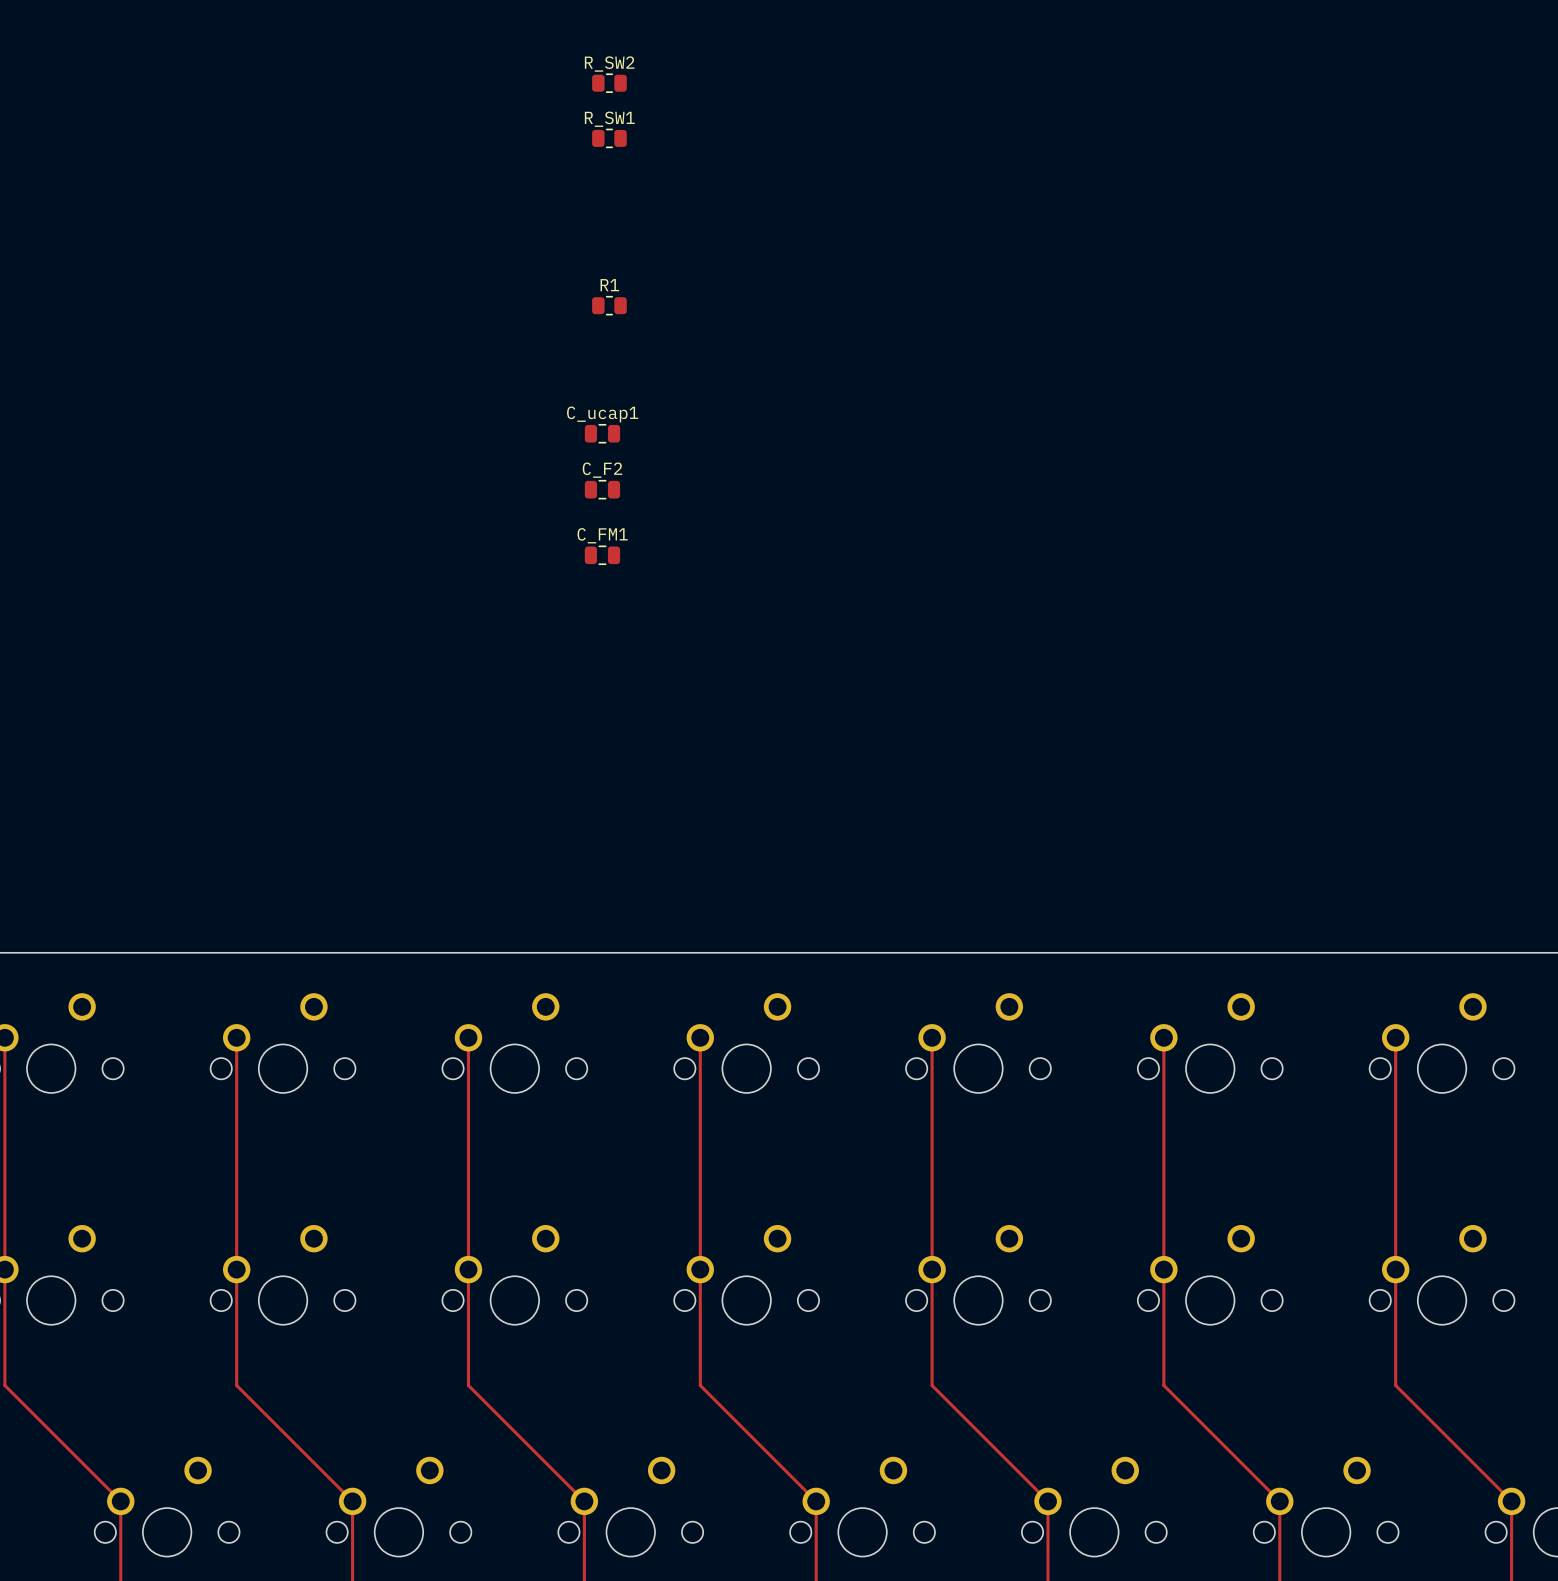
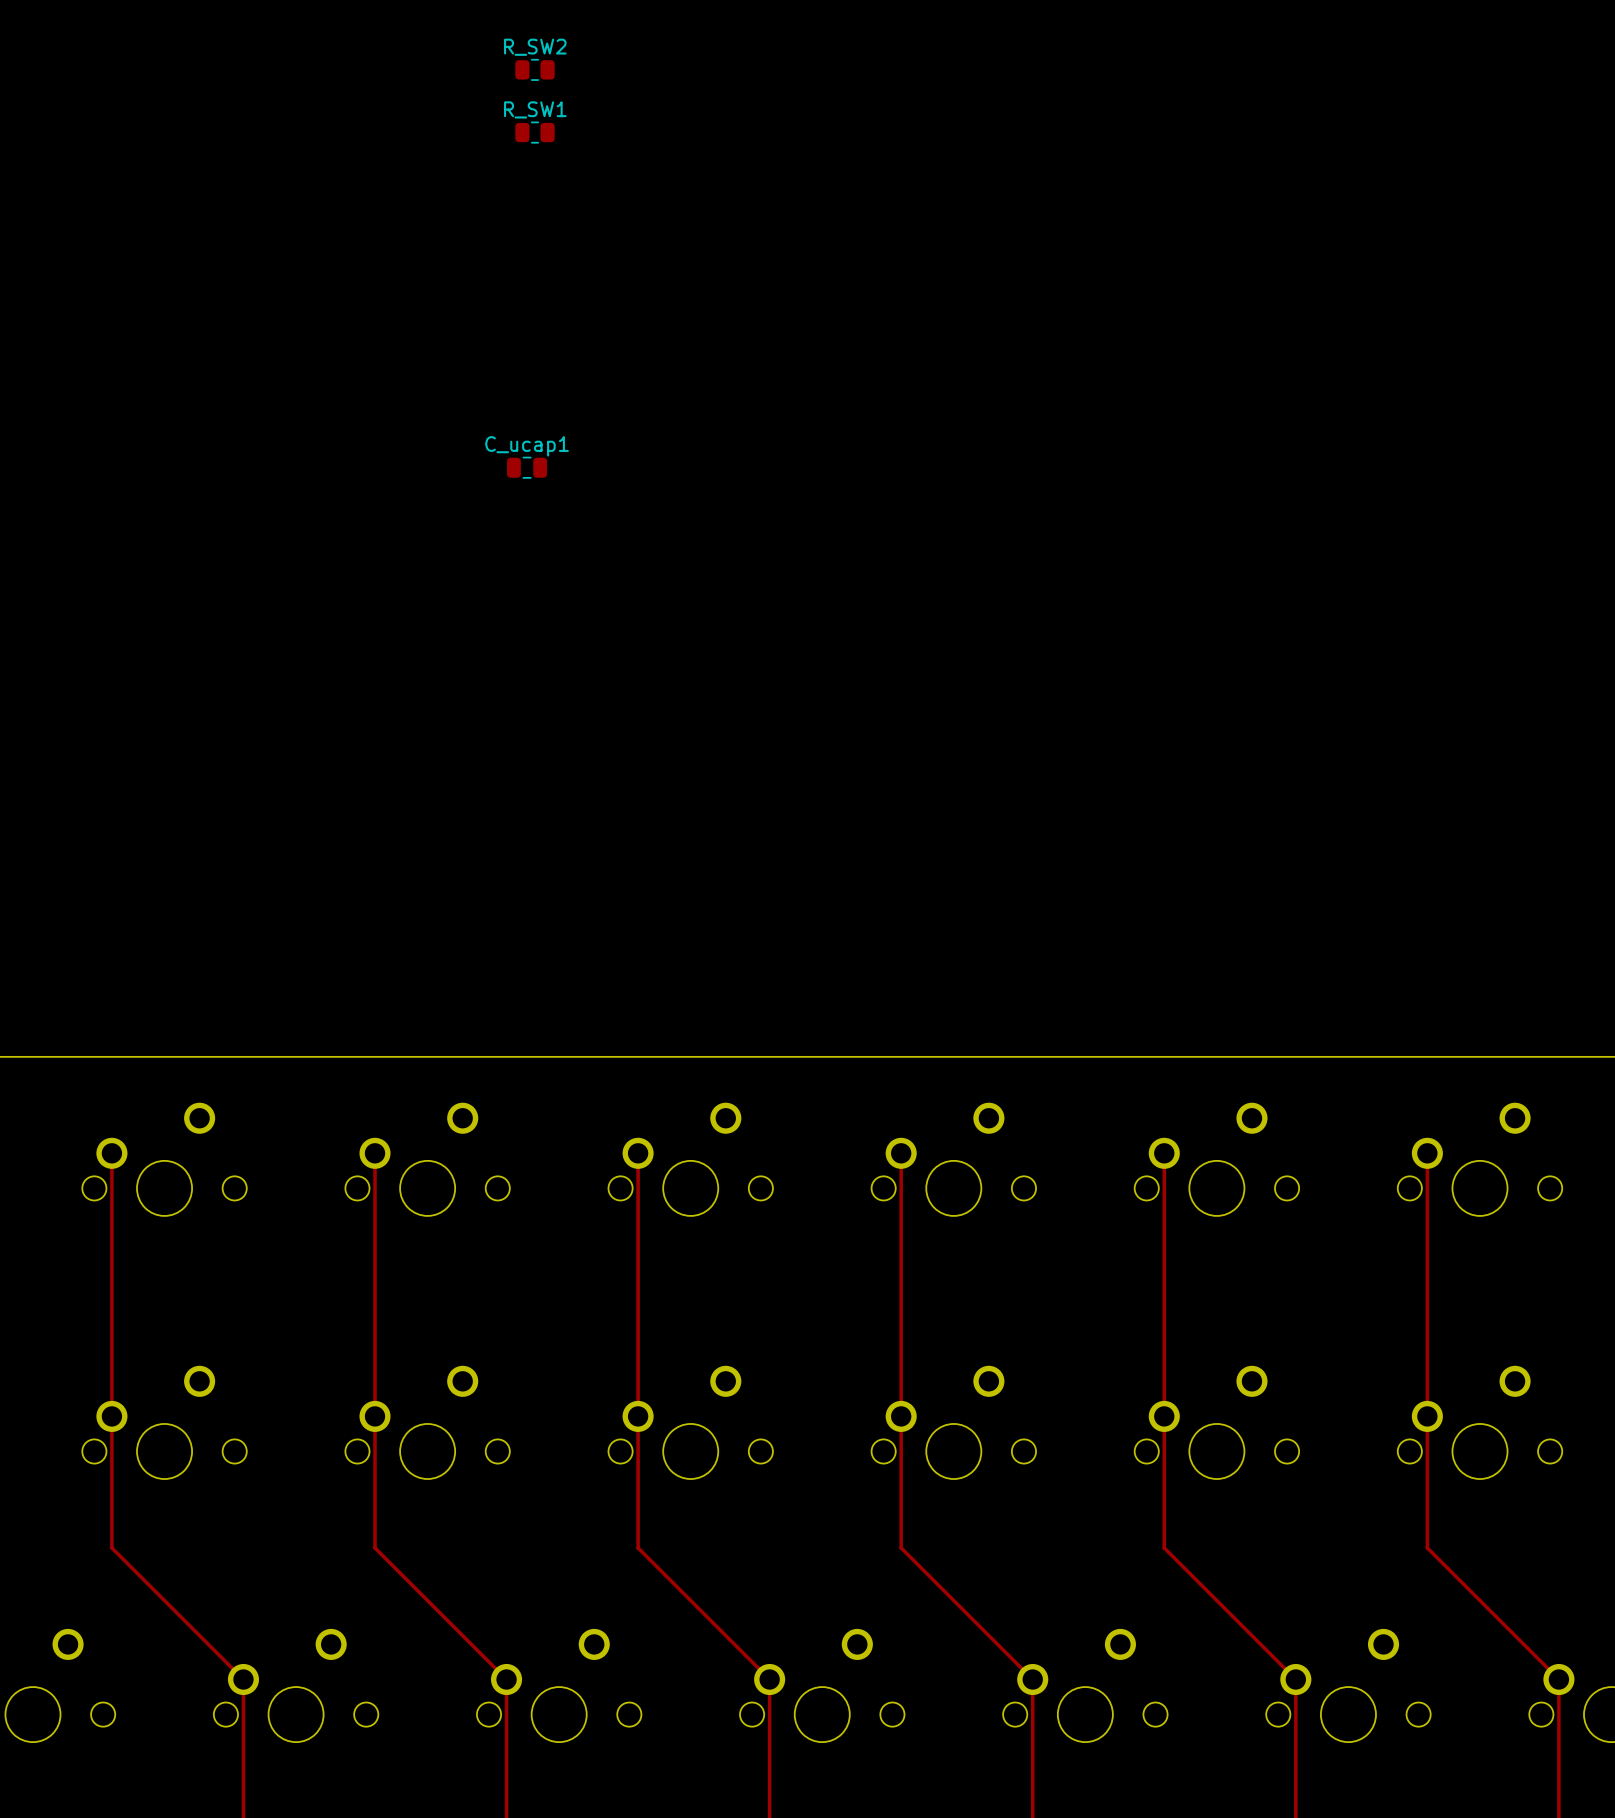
R1: (609, 305) -> none
C_F2: (602, 489) -> none
C_FM1: (602, 555) -> none

